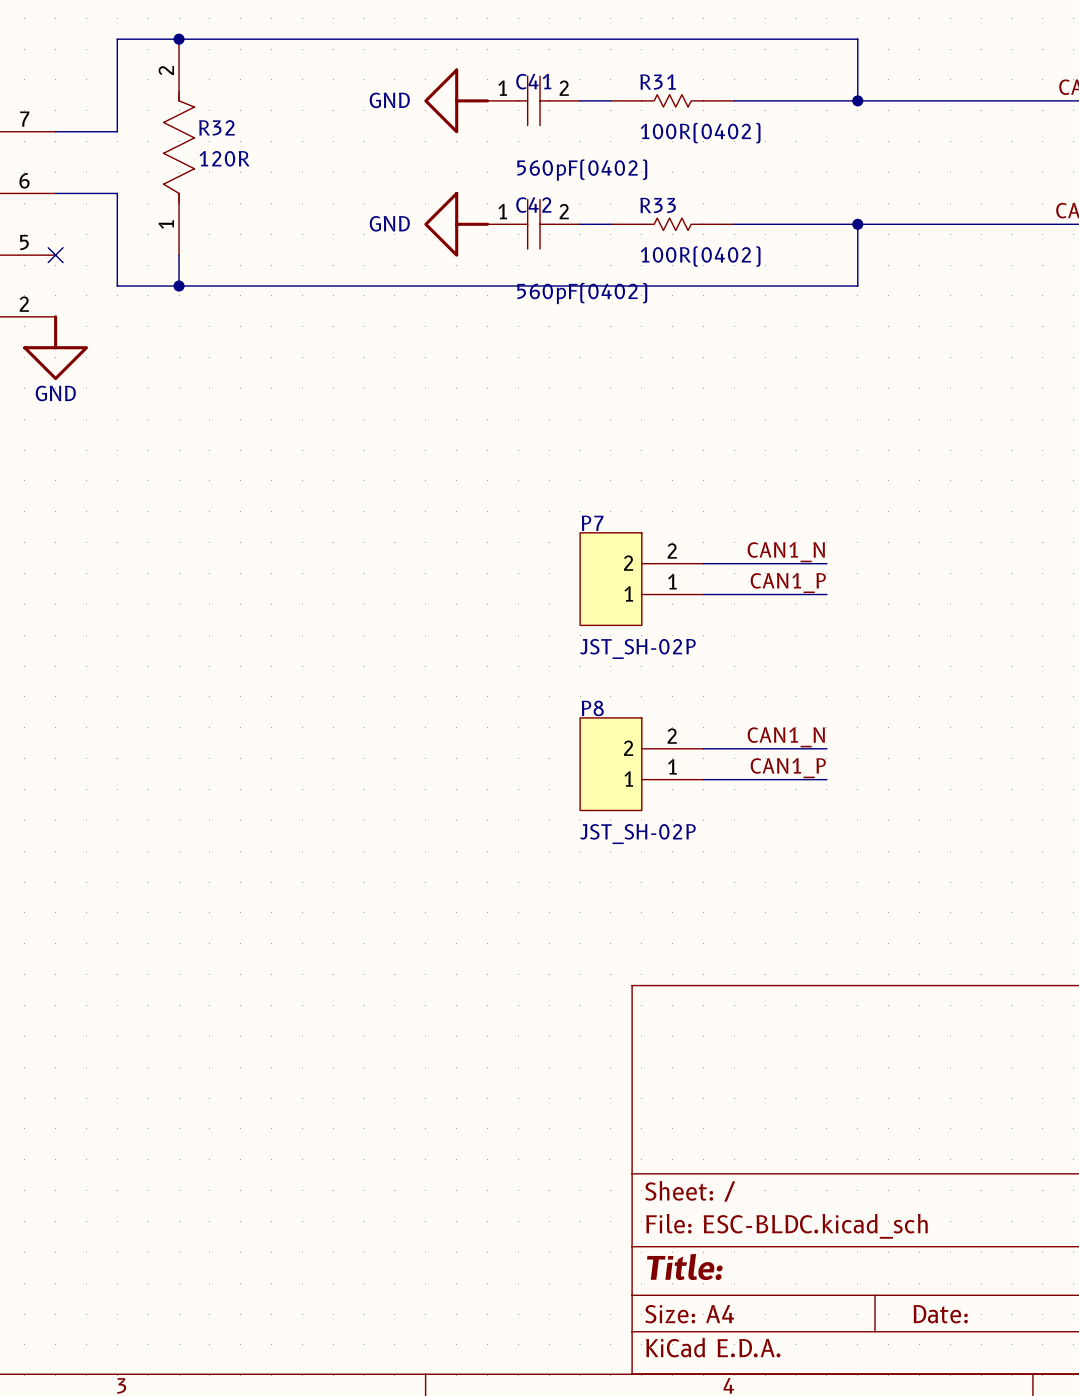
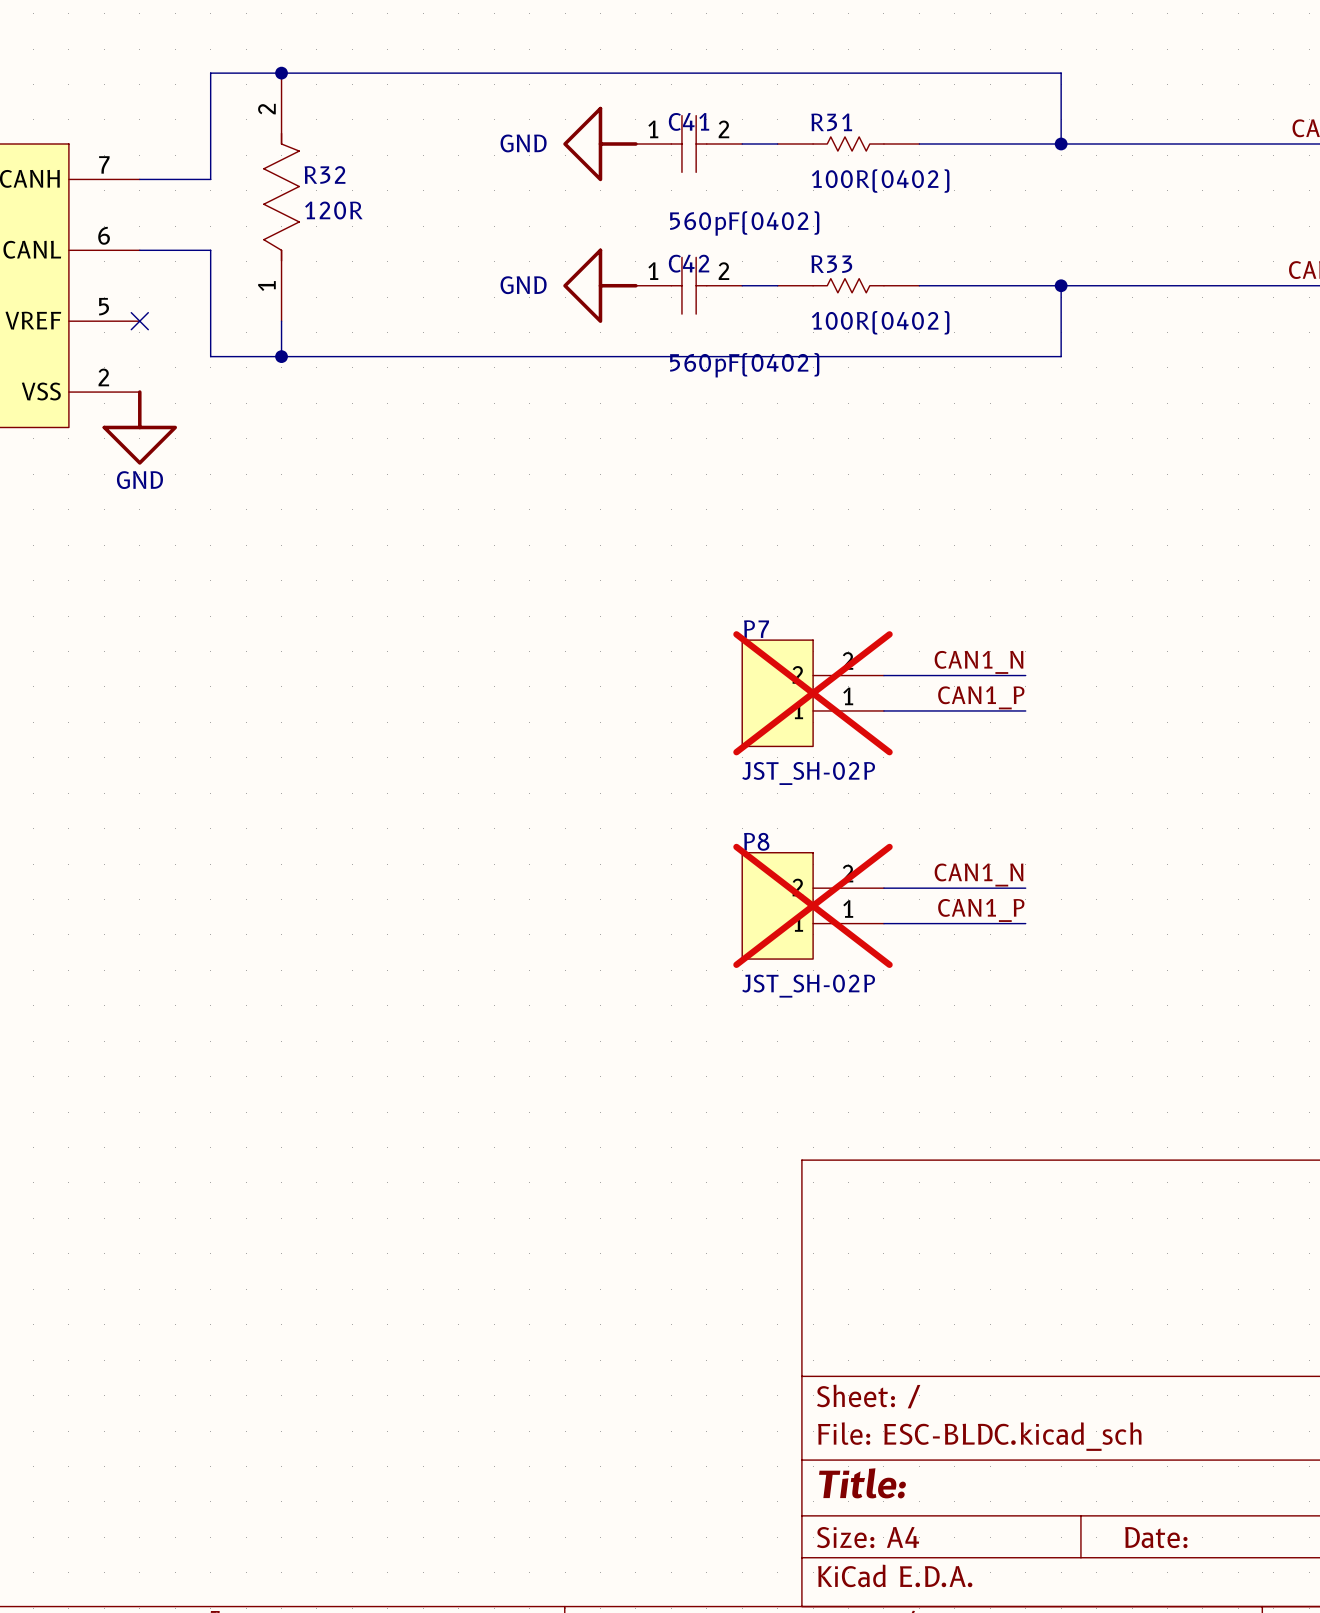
P7 do-not-place cross: none -> (813, 693)
P8 do-not-place cross: none -> (813, 905)

